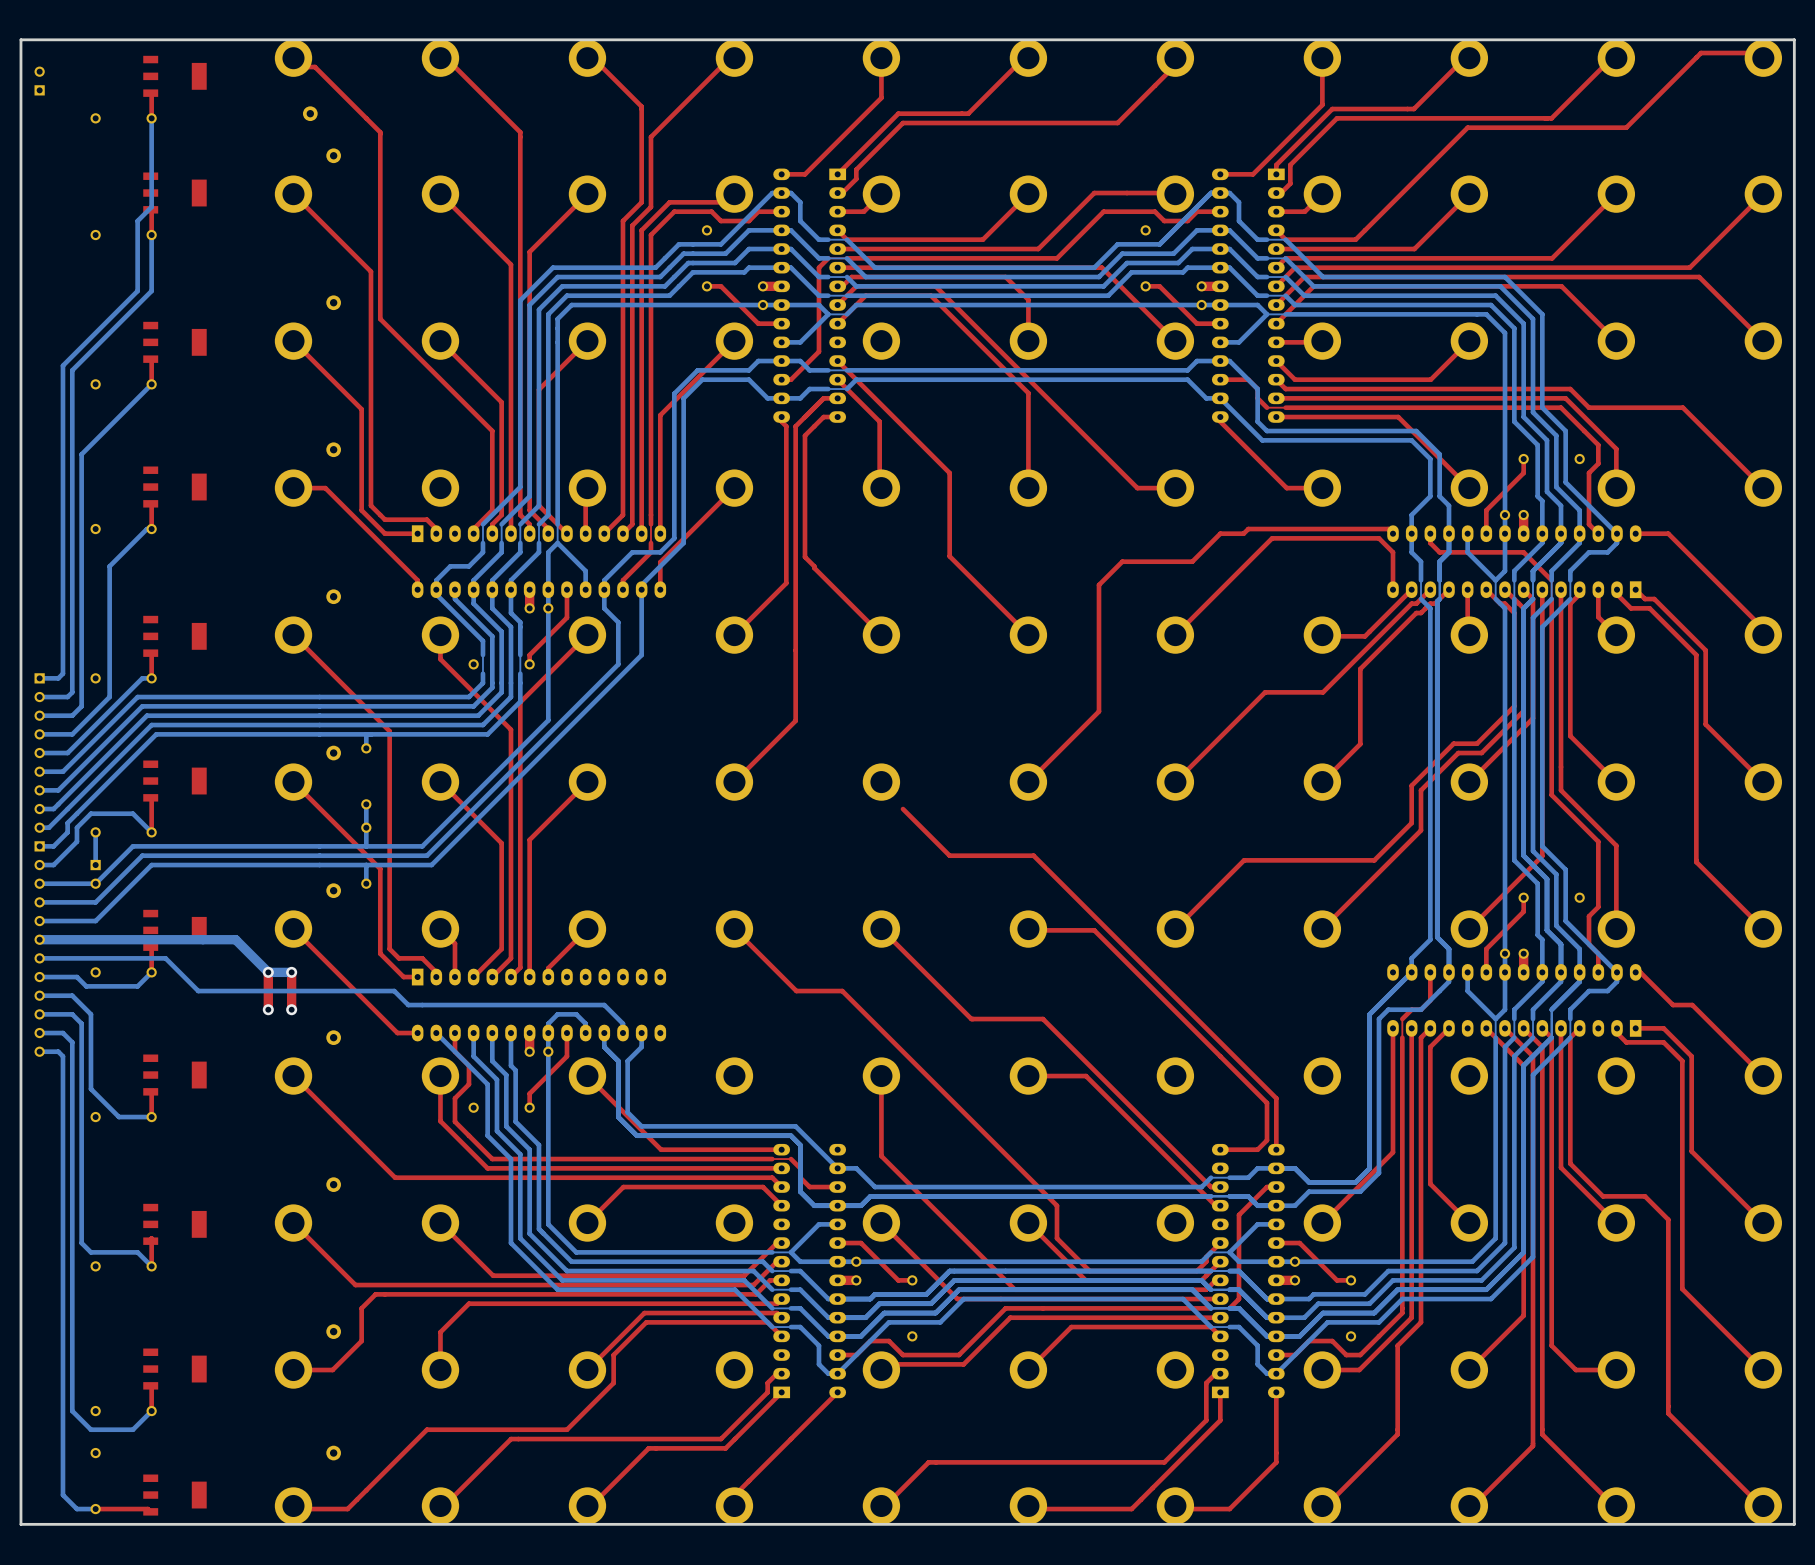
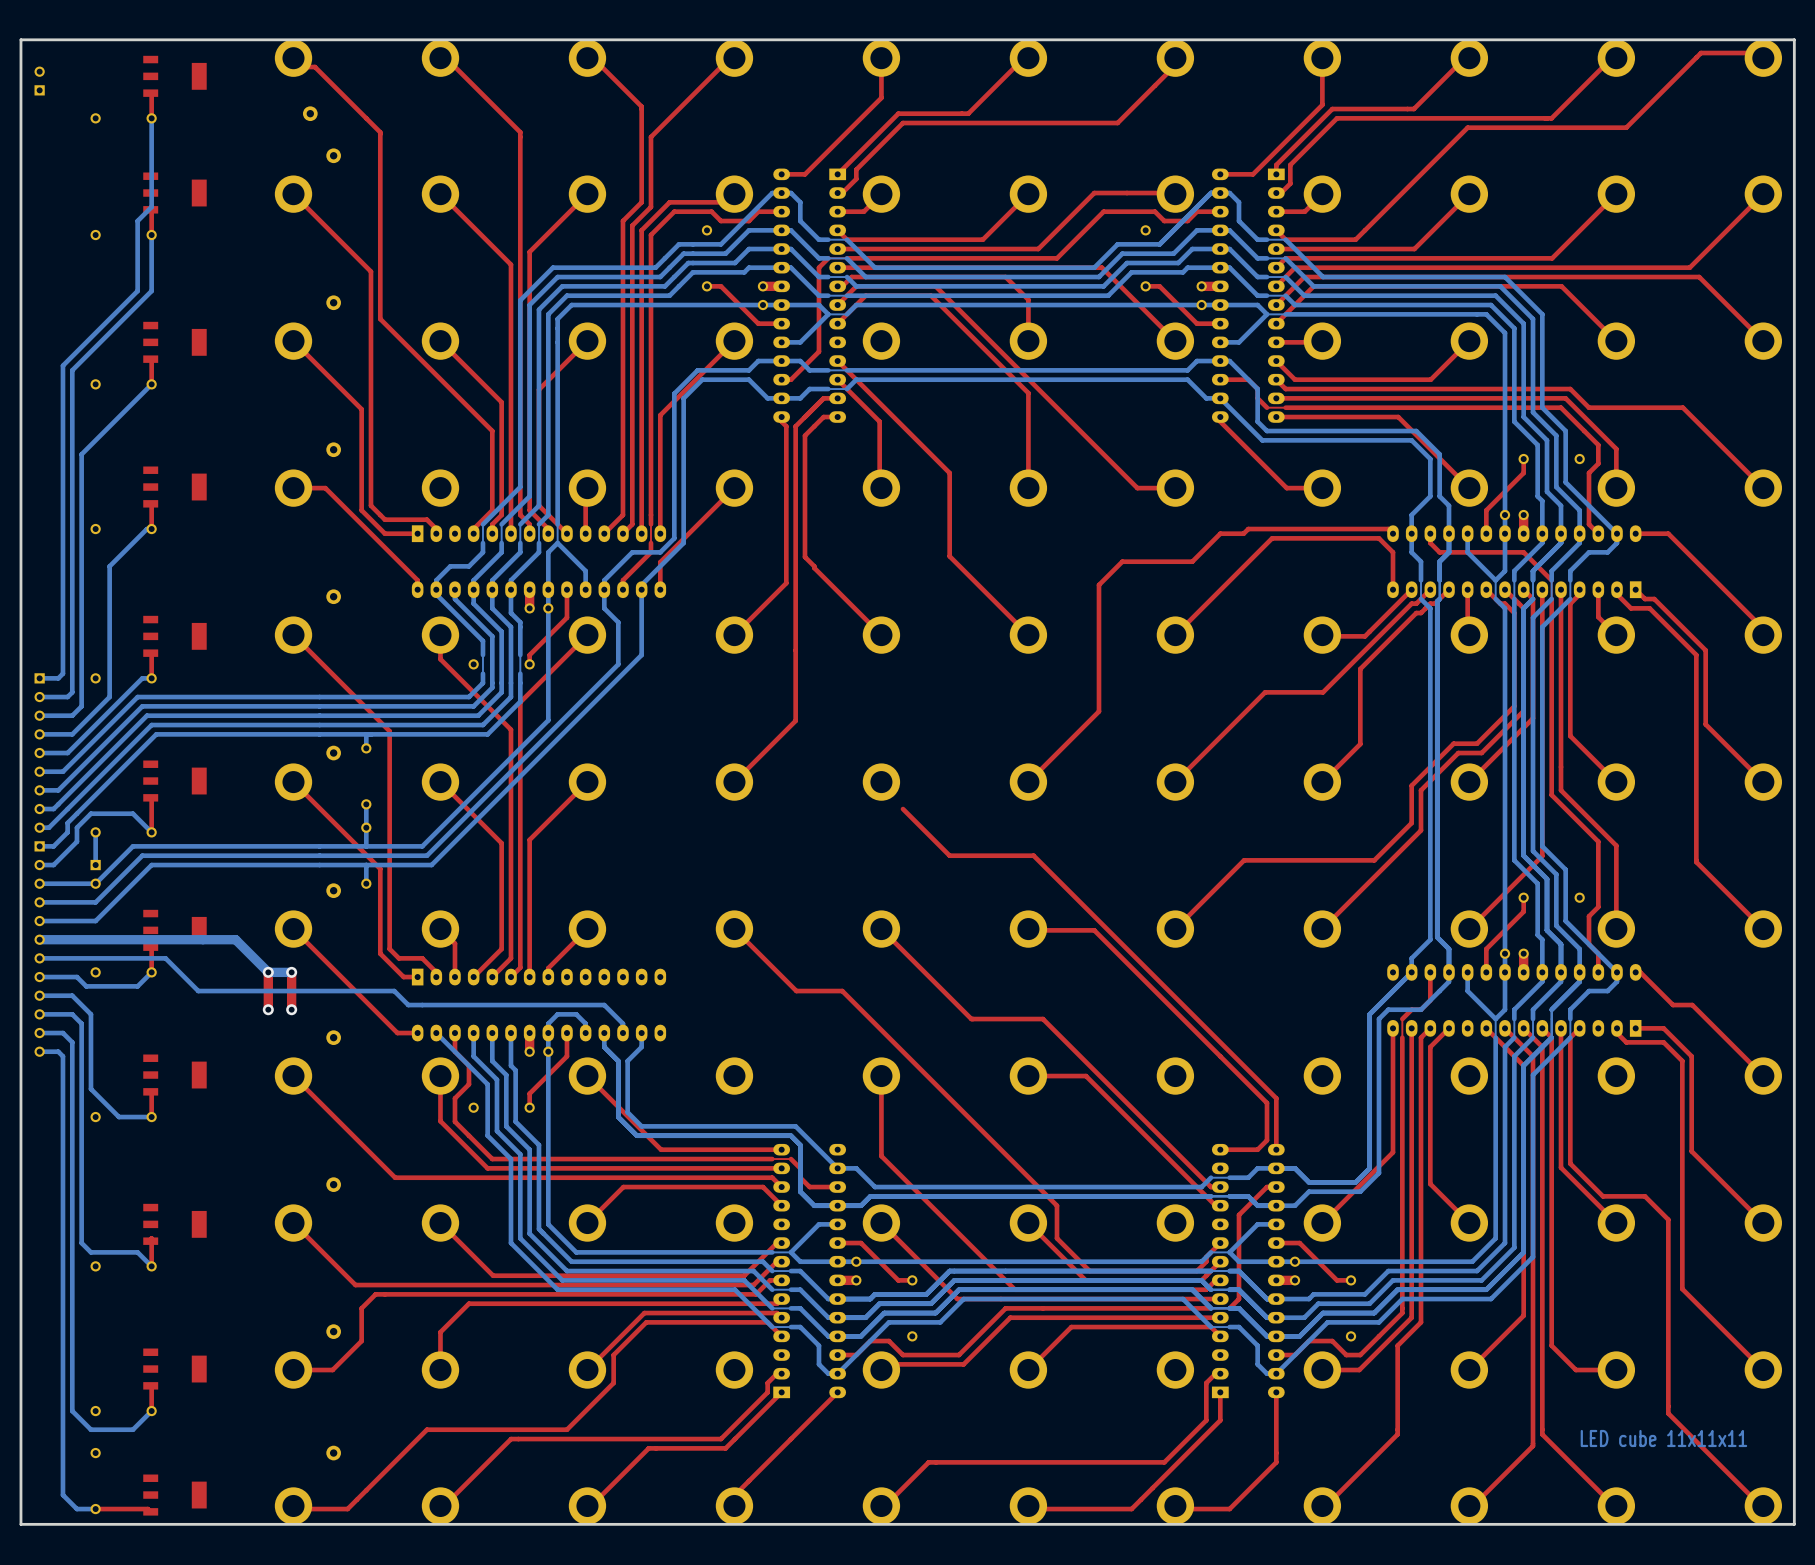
text: none -> LED cube 11x11x11 (1663, 1438)

